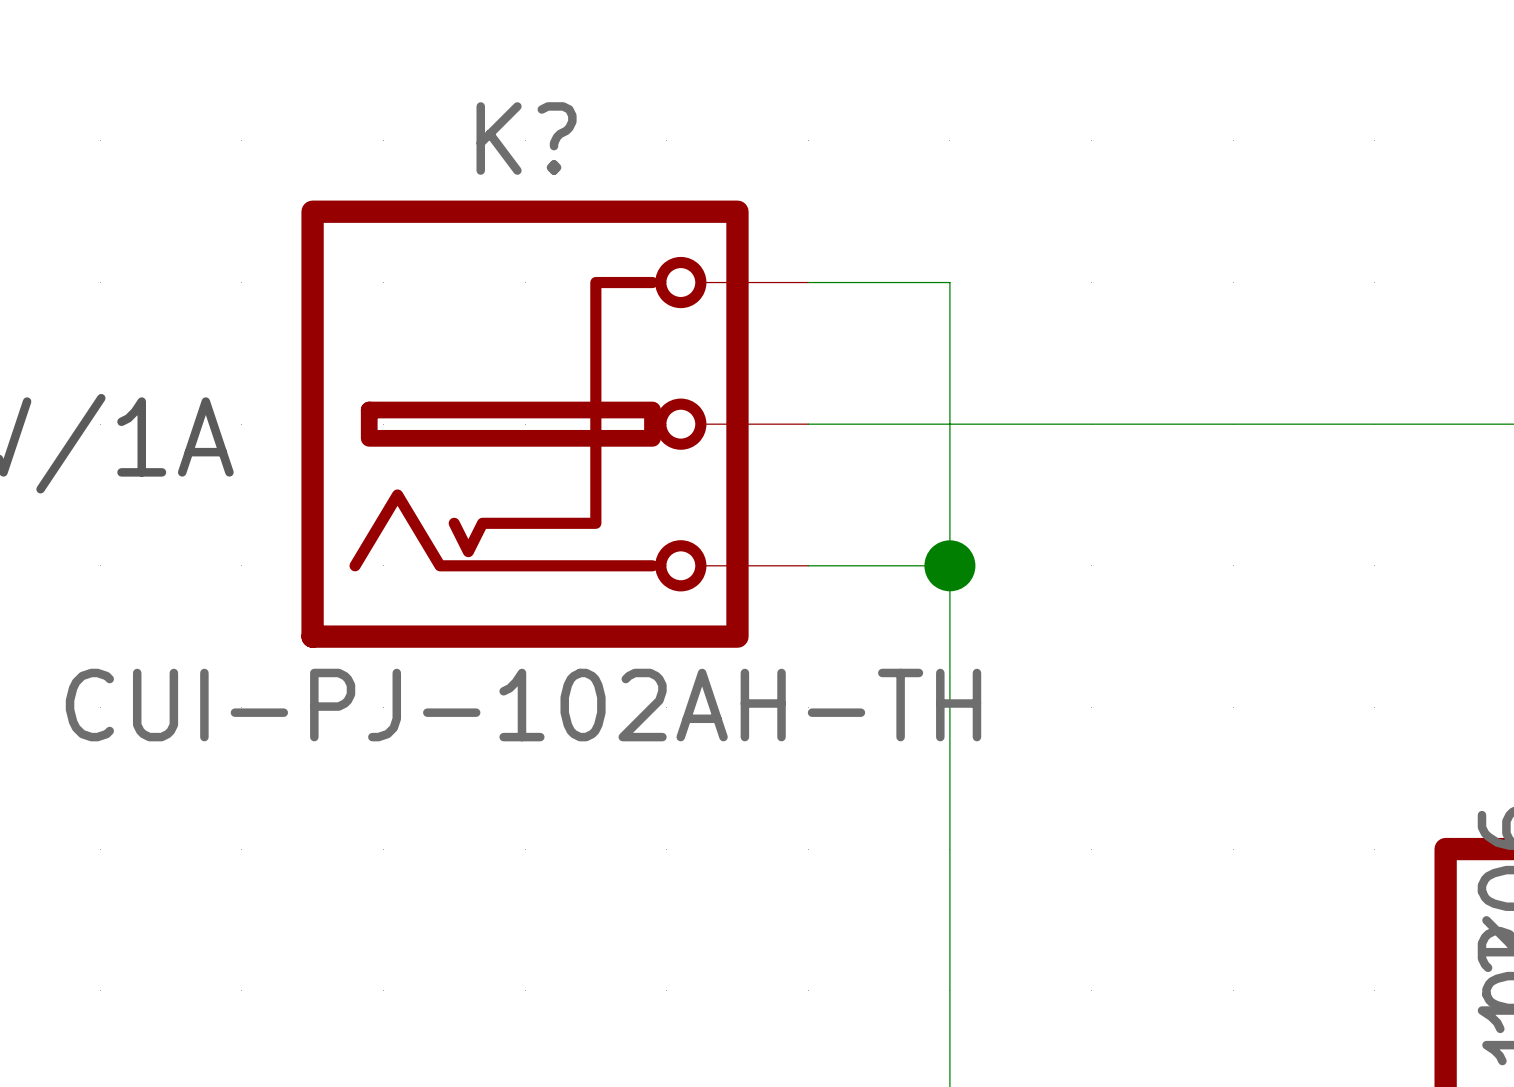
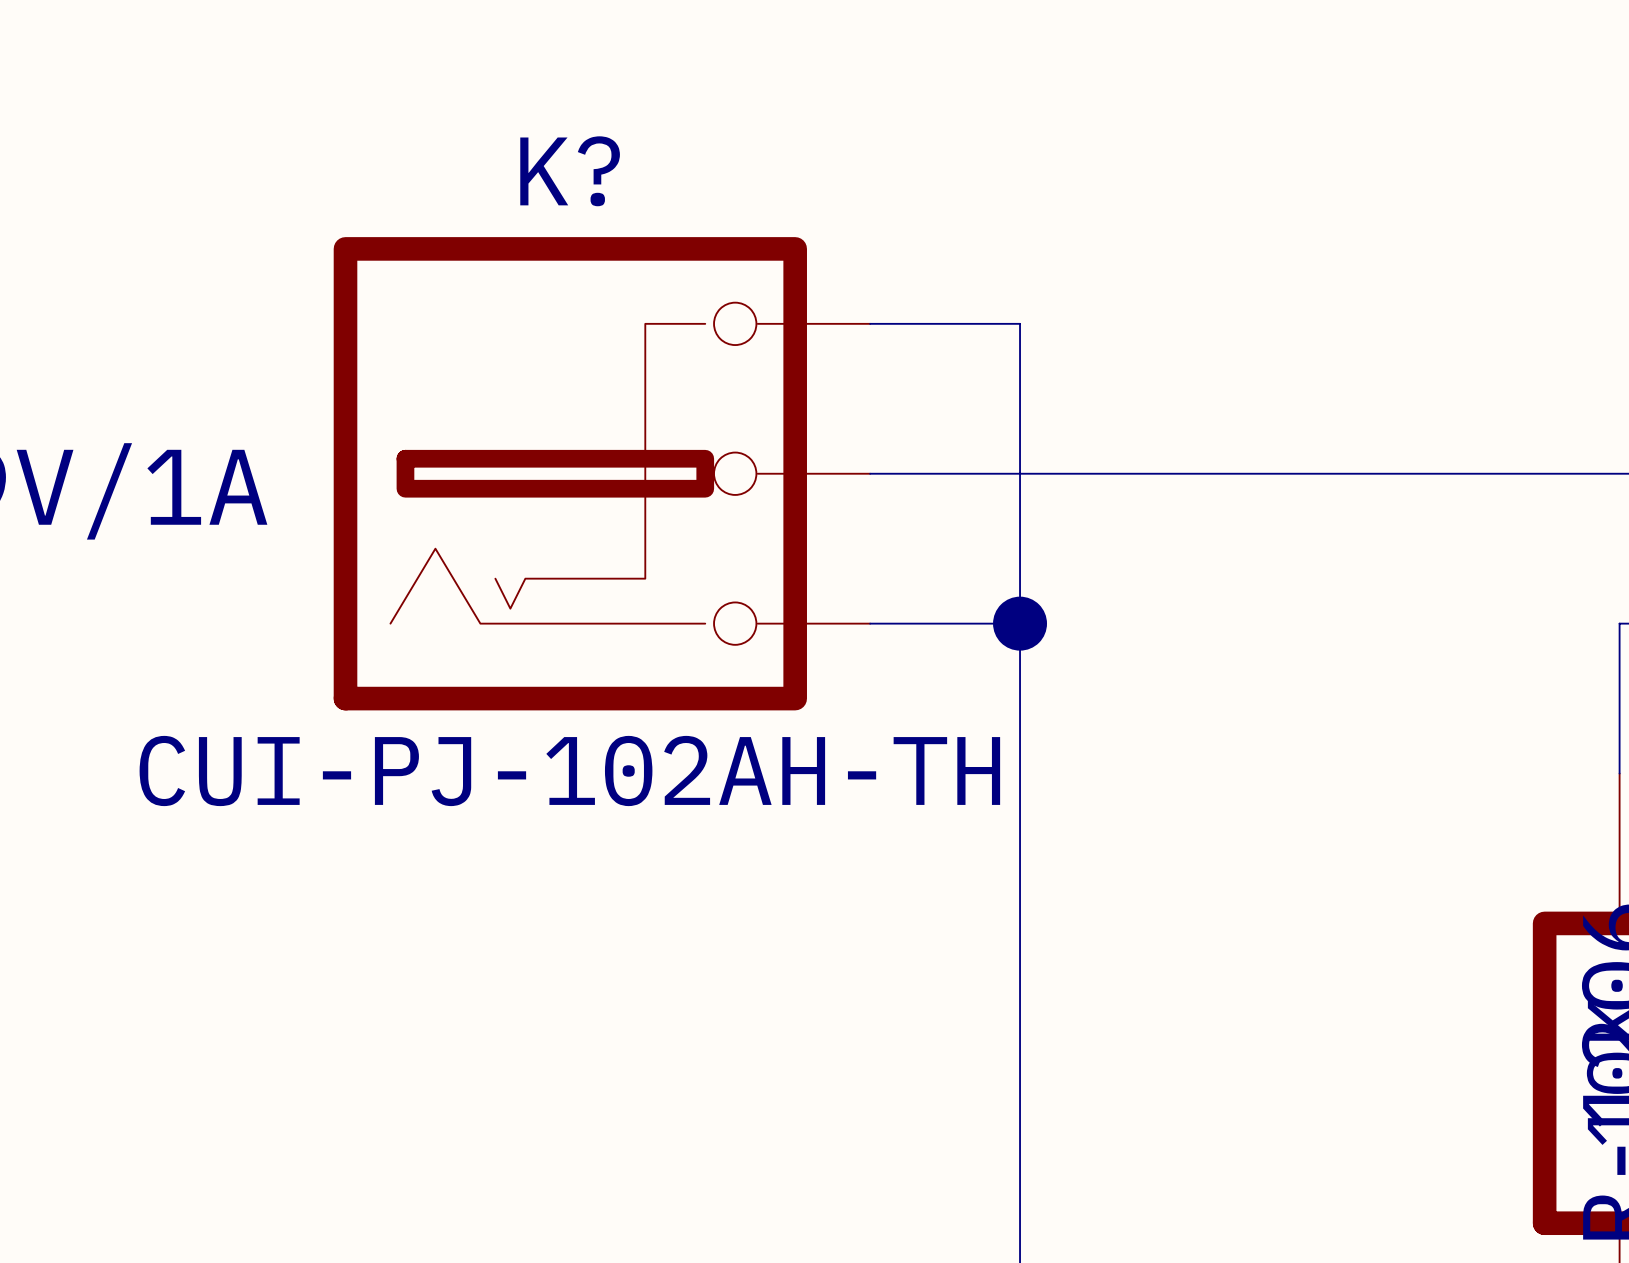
K? symbol: [301, 200, 809, 648] -> [333, 237, 871, 711]

